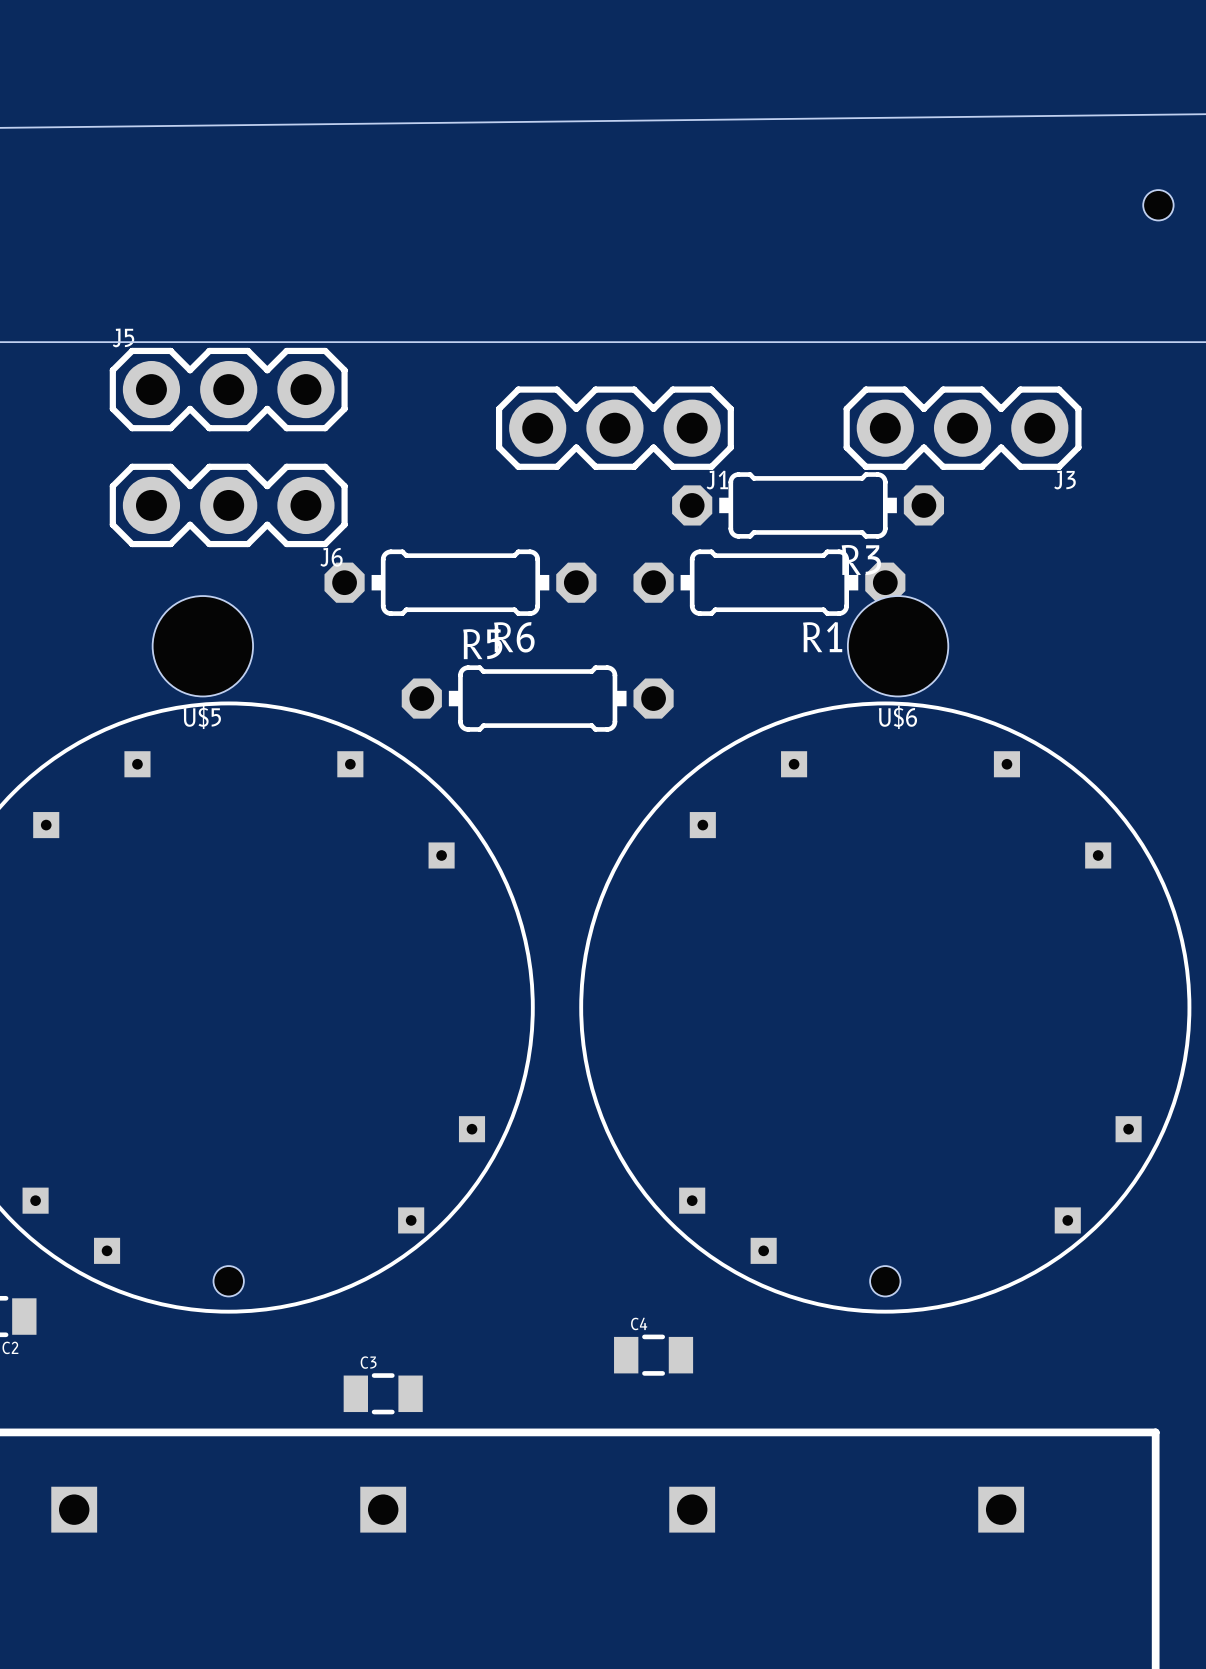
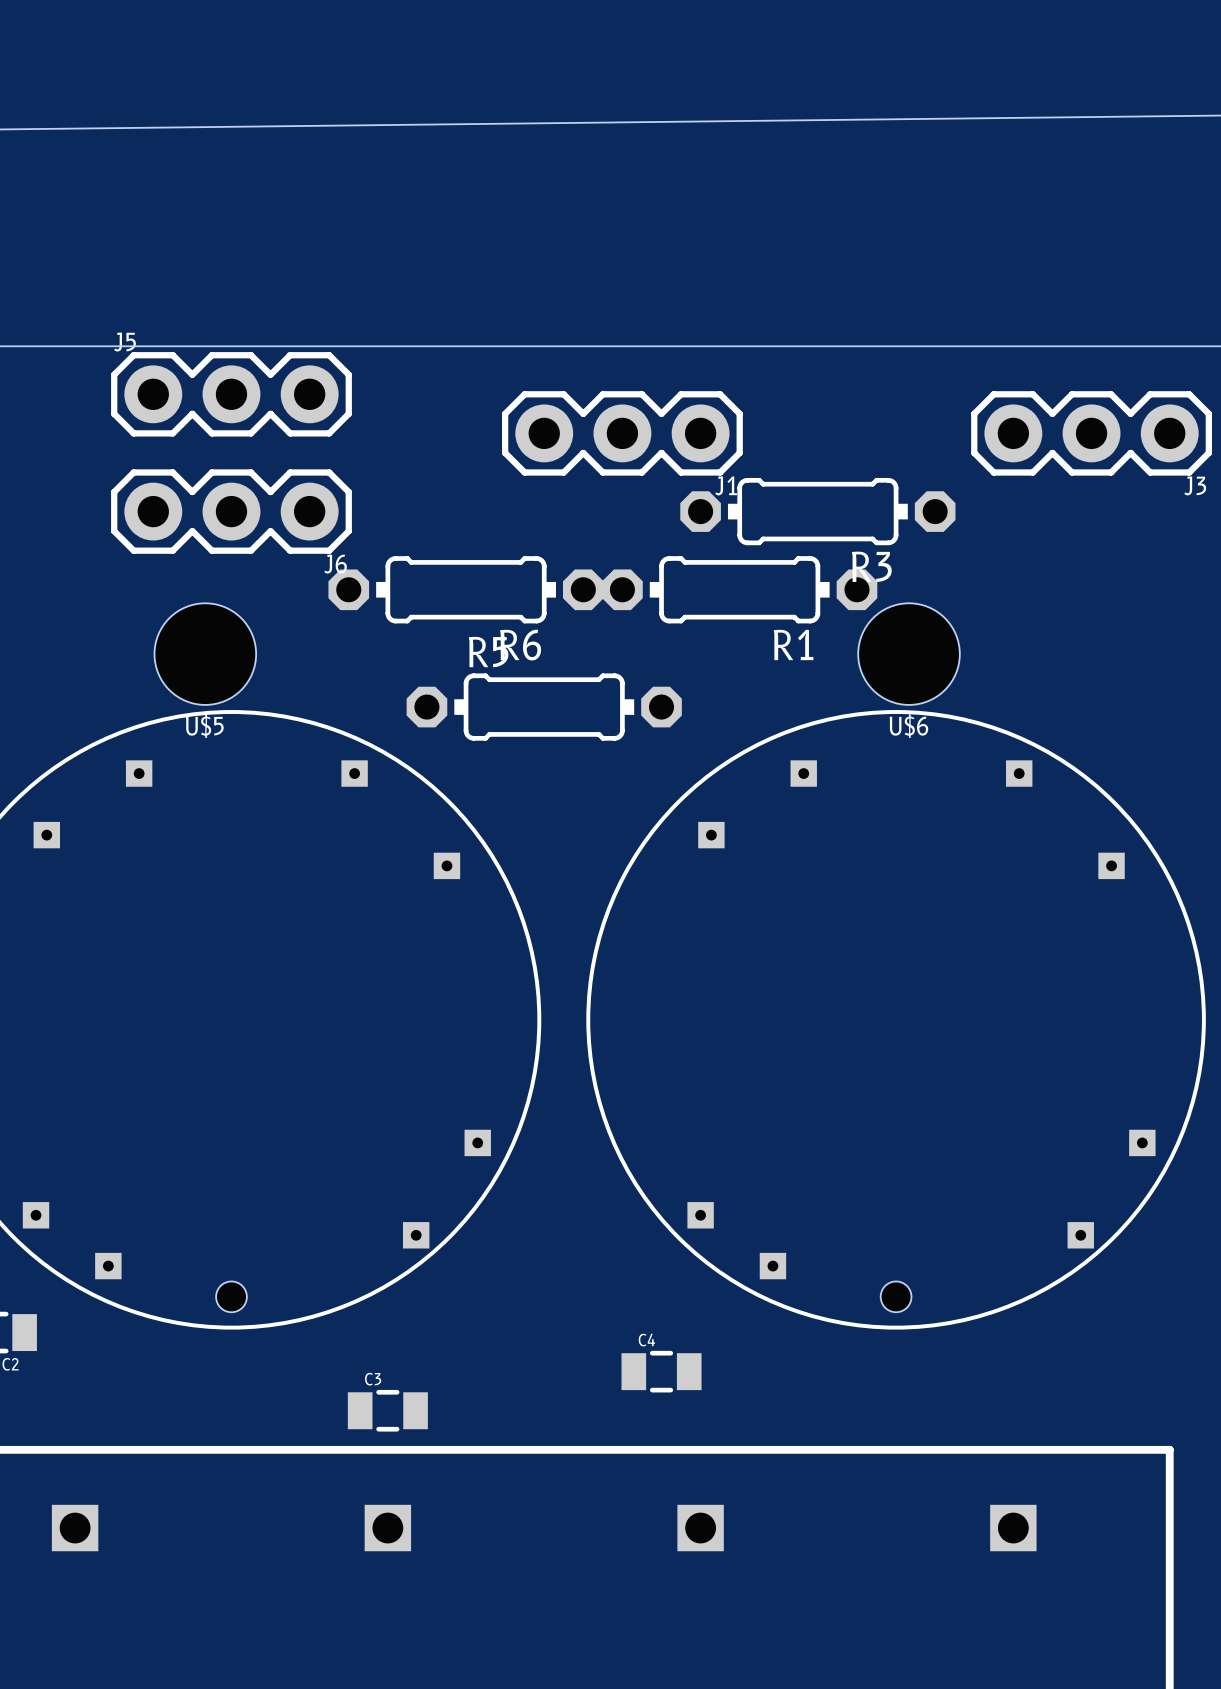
hole: (1158, 205) -> none
J3 position: (962, 428) -> (1091, 433)
R1 position: (769, 582) -> (739, 589)

